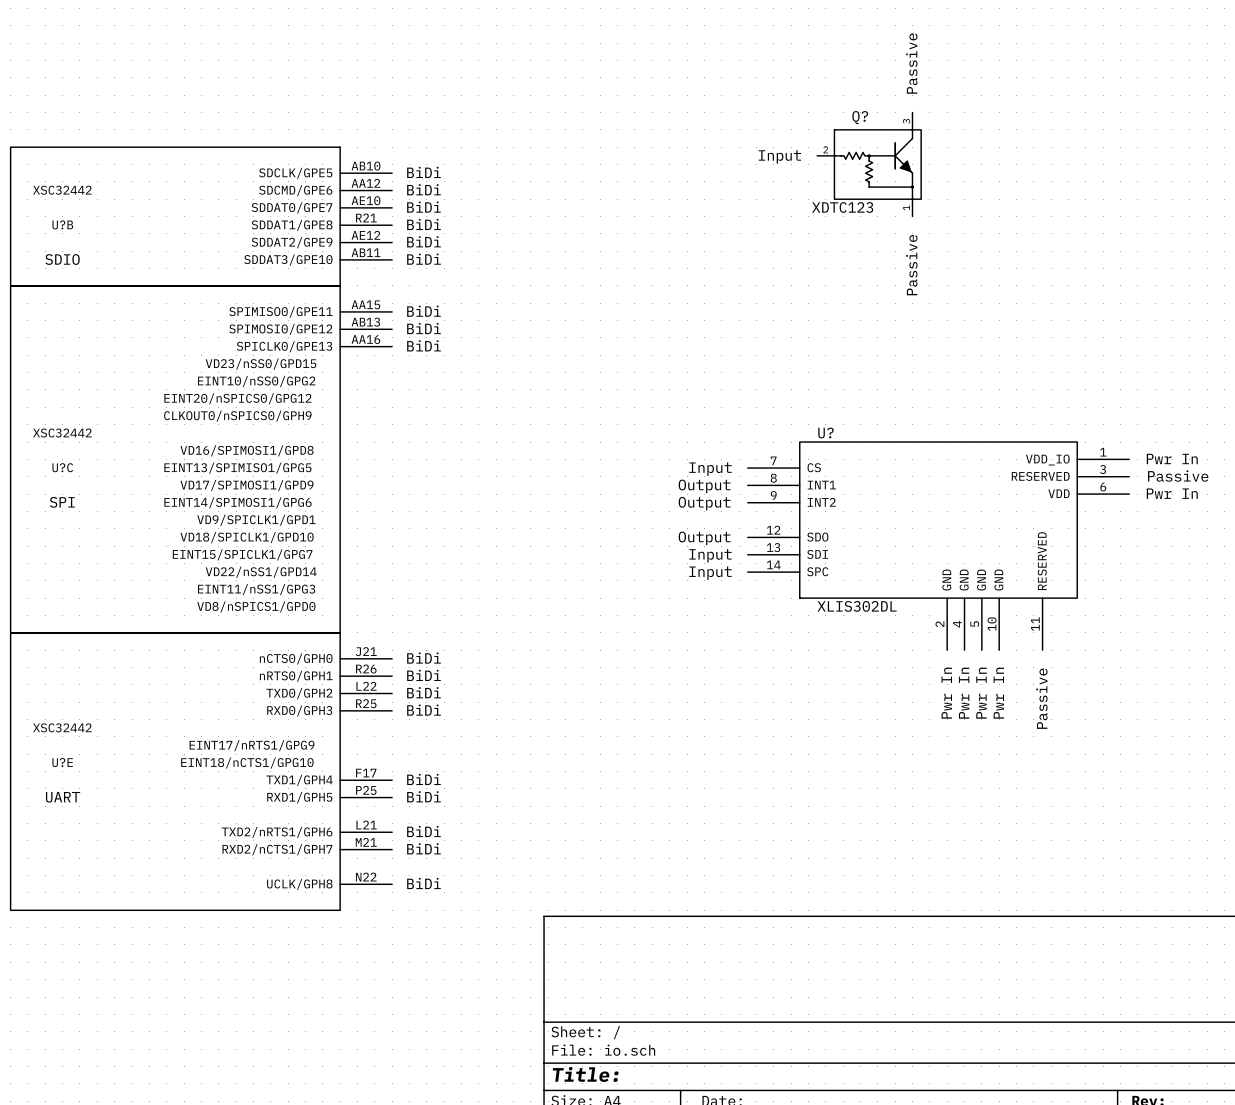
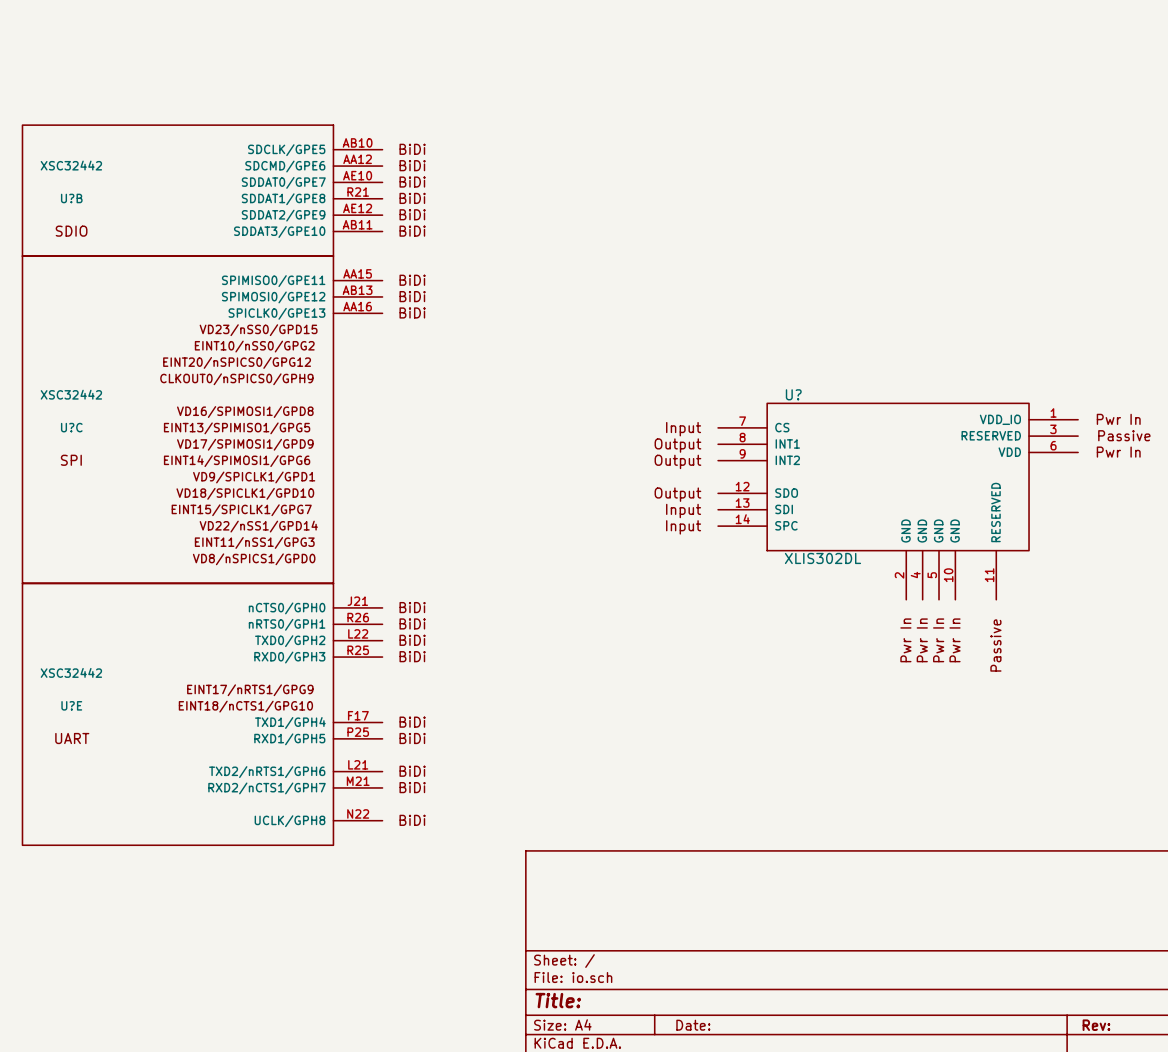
Q?: XDTC123 (869, 164) -> none

